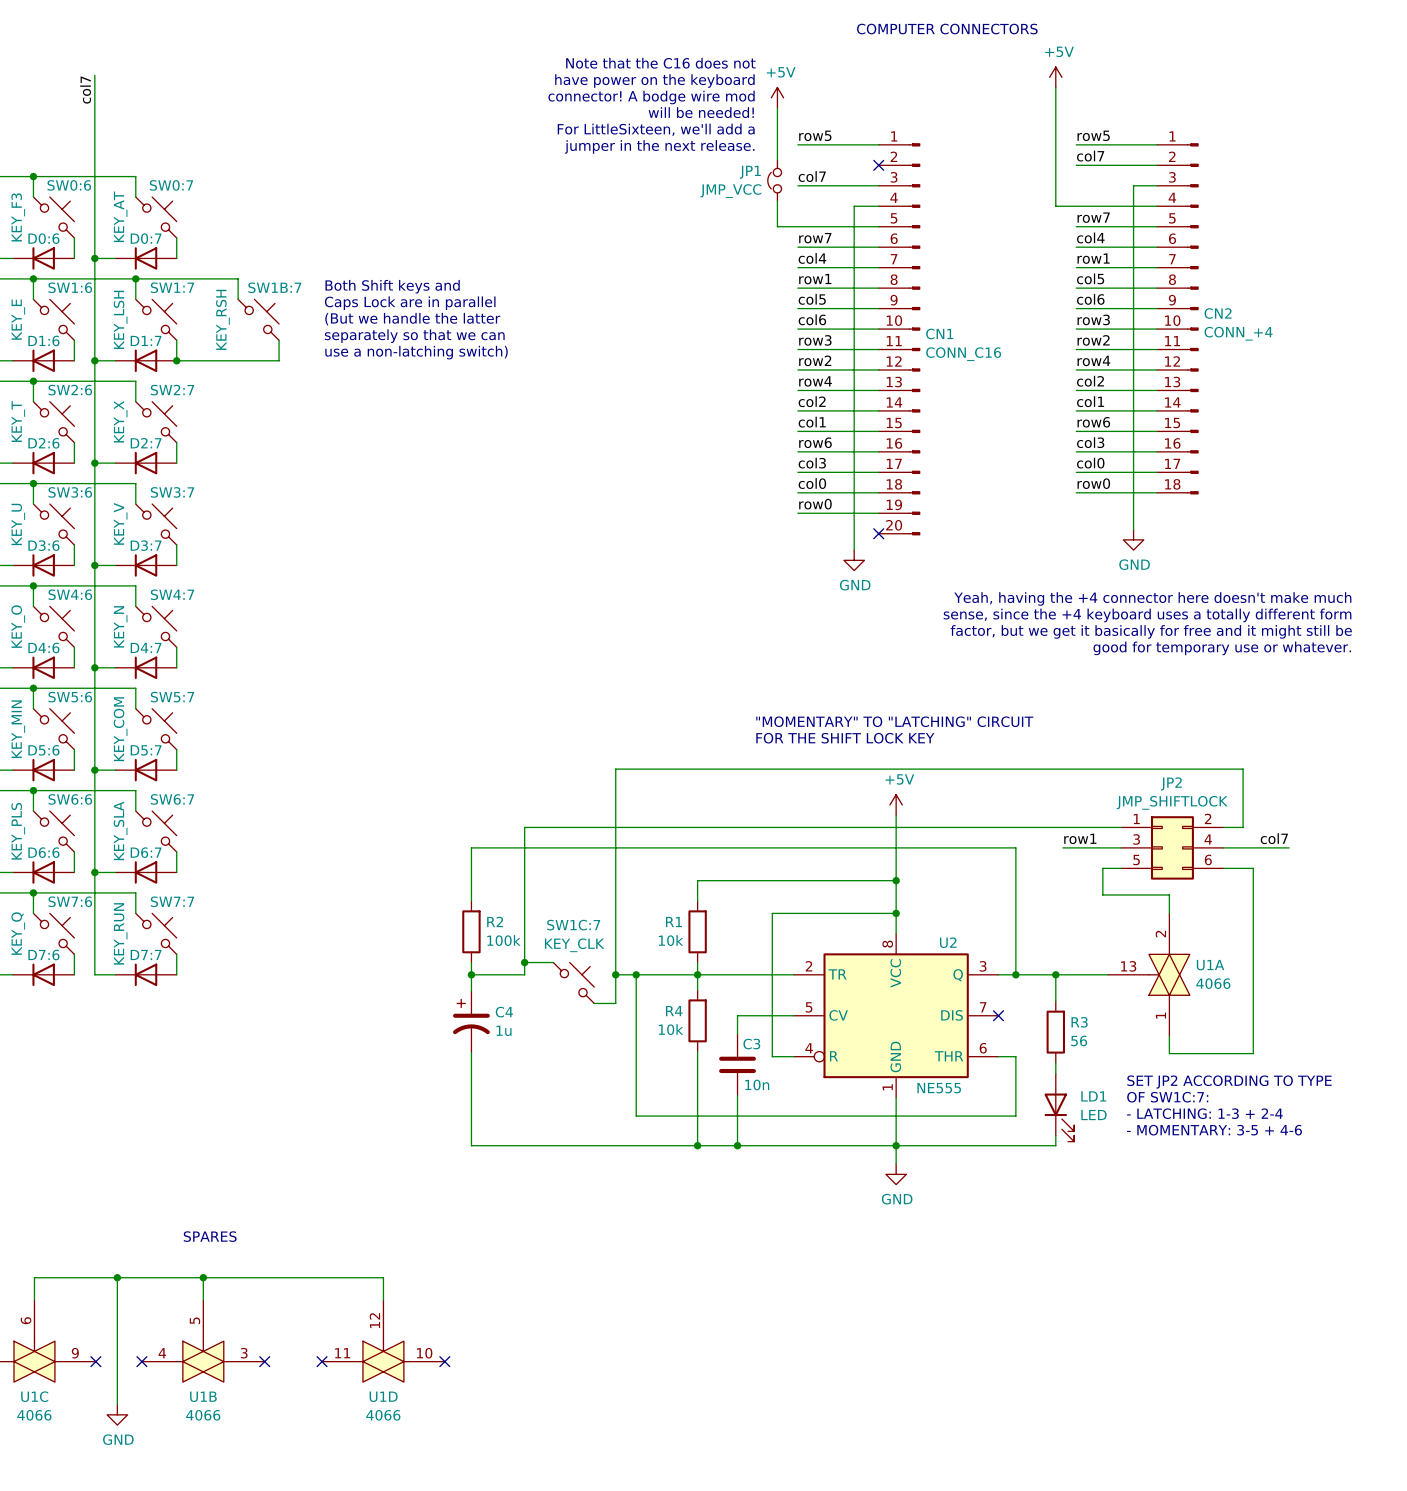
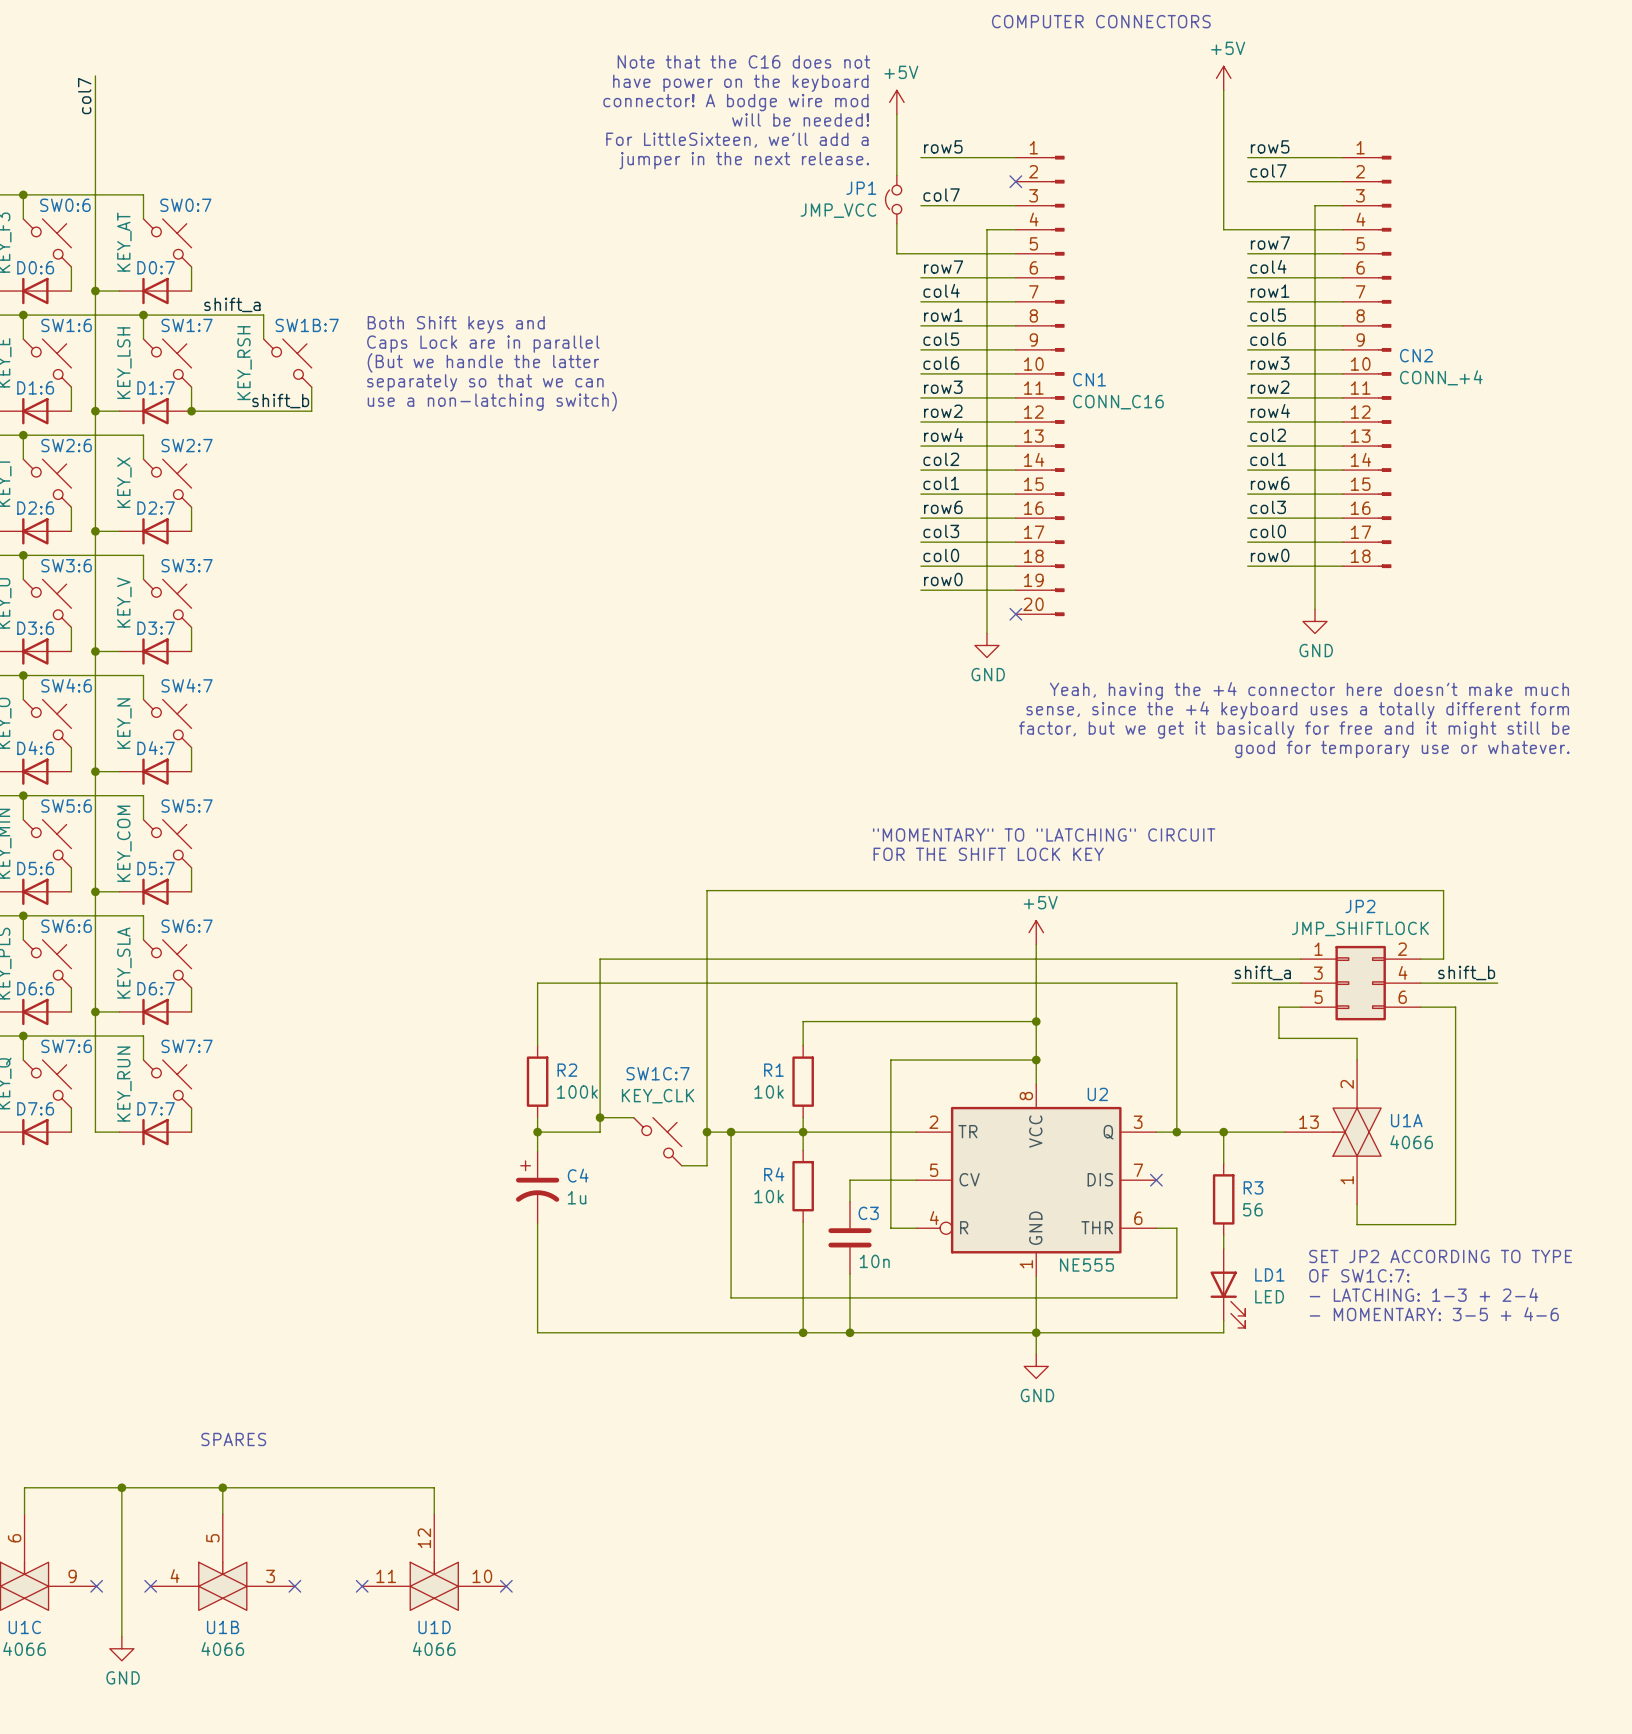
label: none -> shift_a (232, 304)
label: none -> shift_b (280, 401)
label: row1 (1080, 838) -> shift_a (1262, 972)
label: col7 (1274, 838) -> shift_b (1466, 972)

